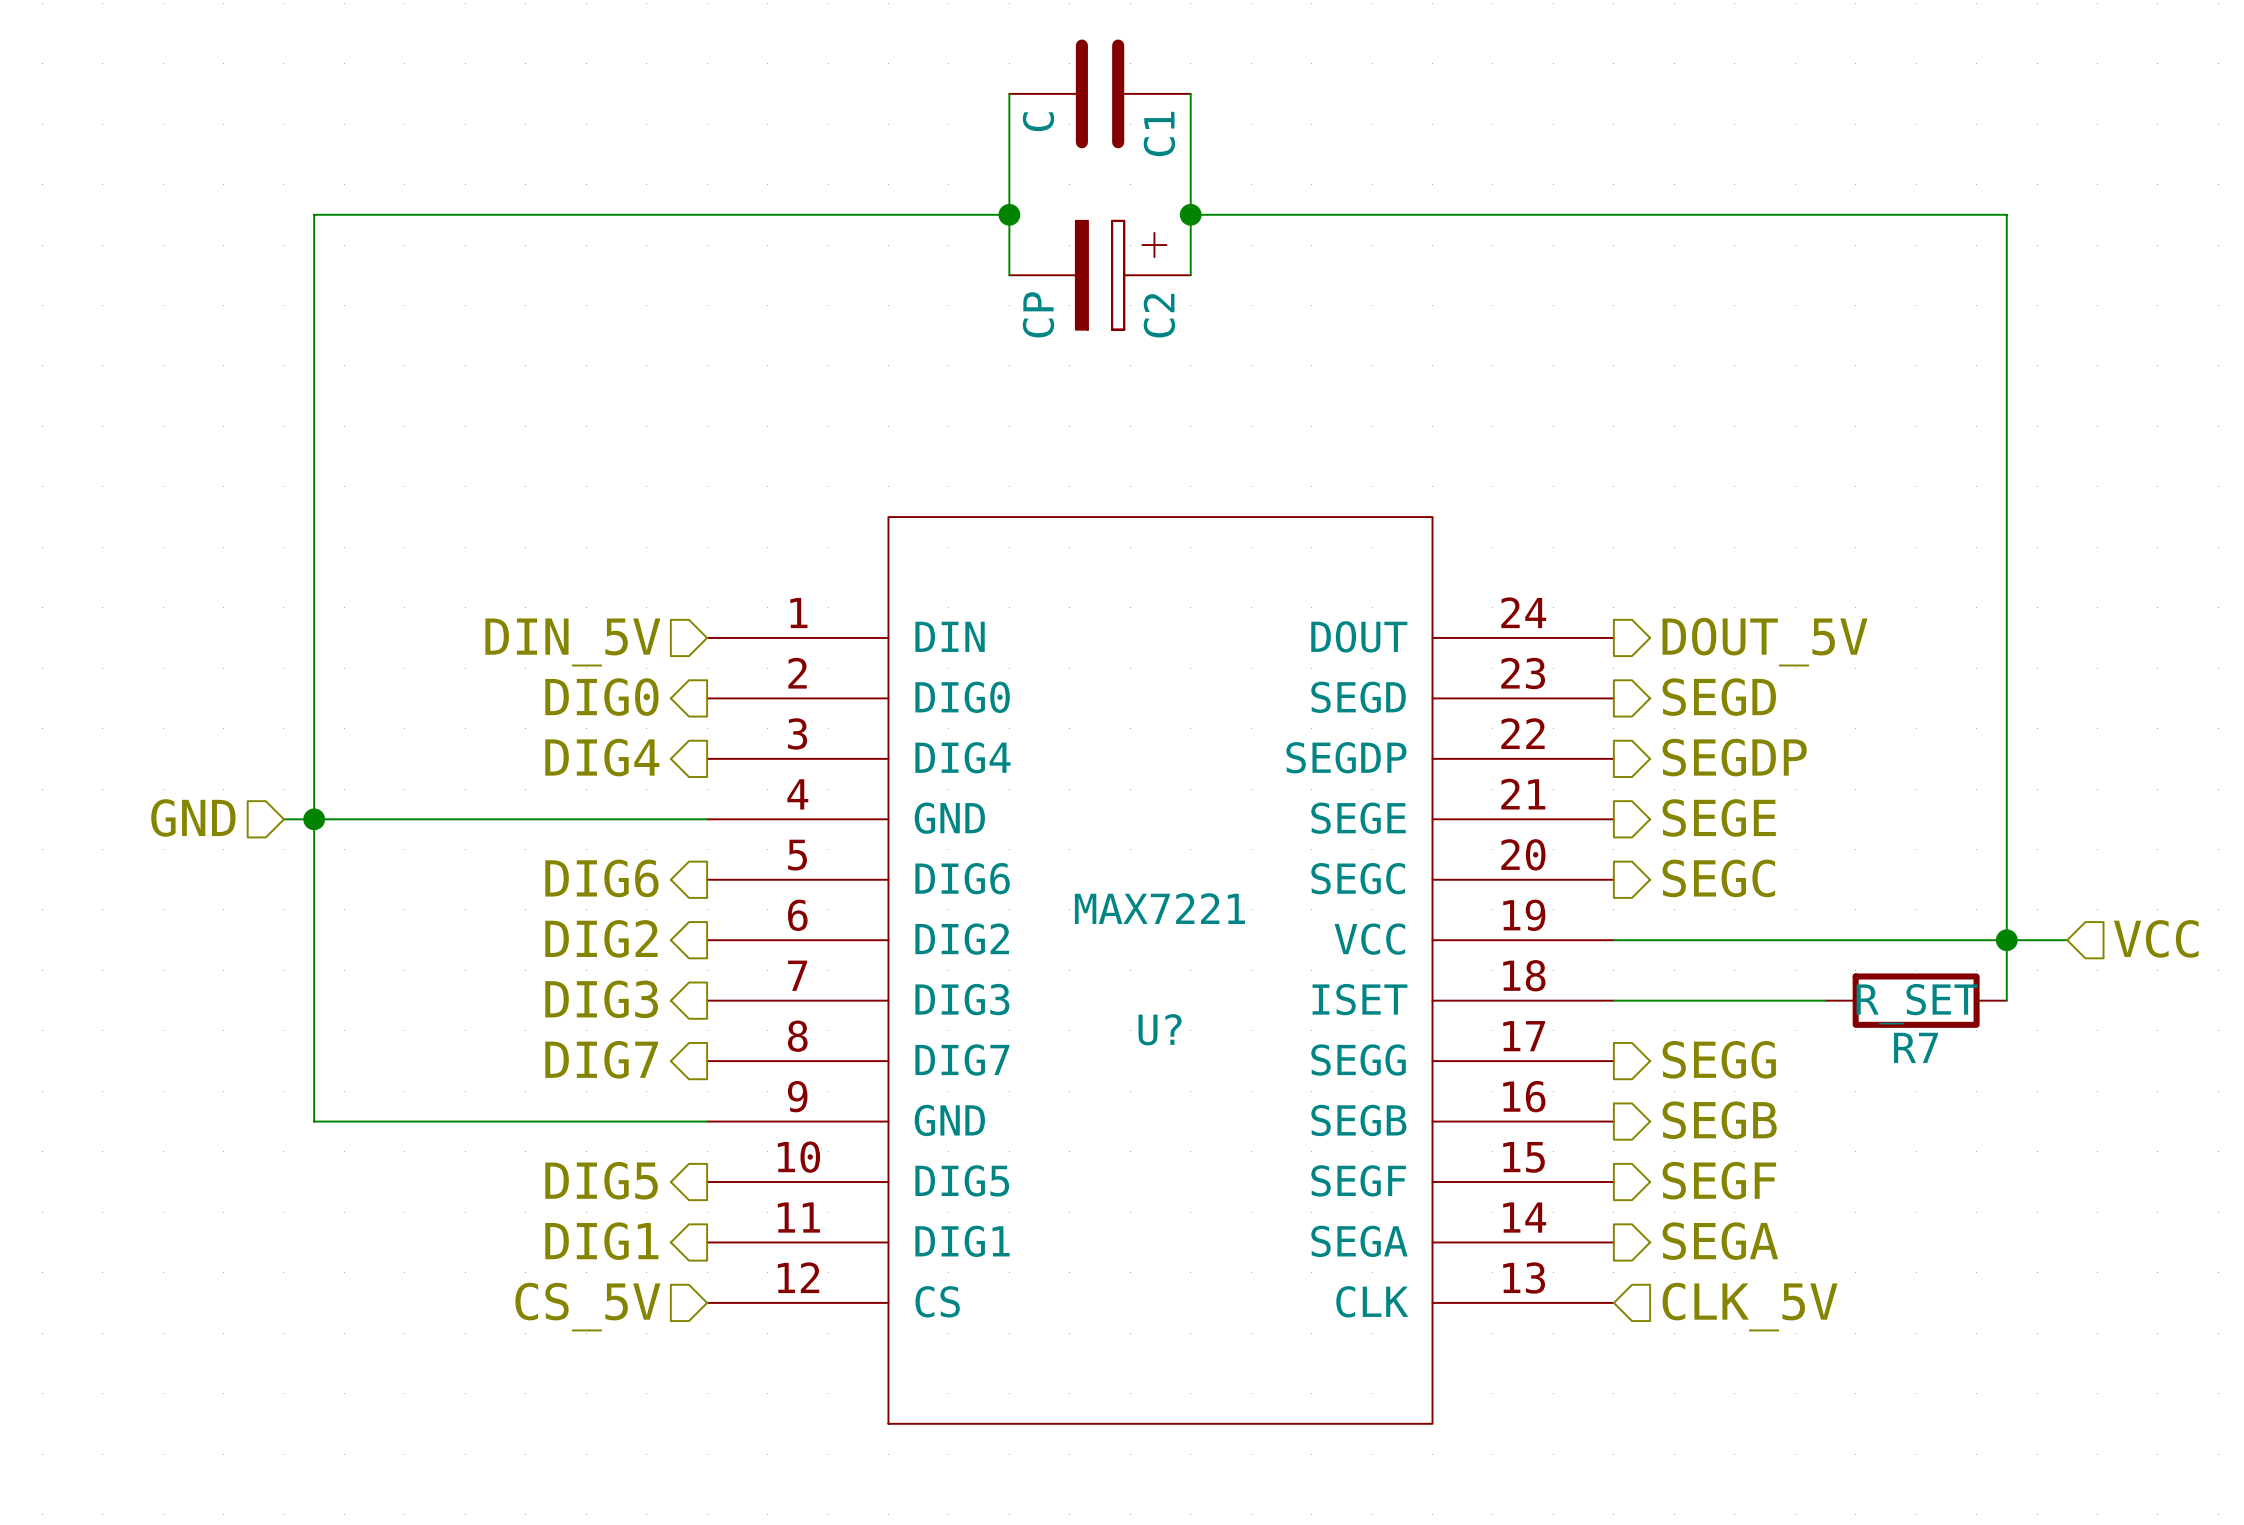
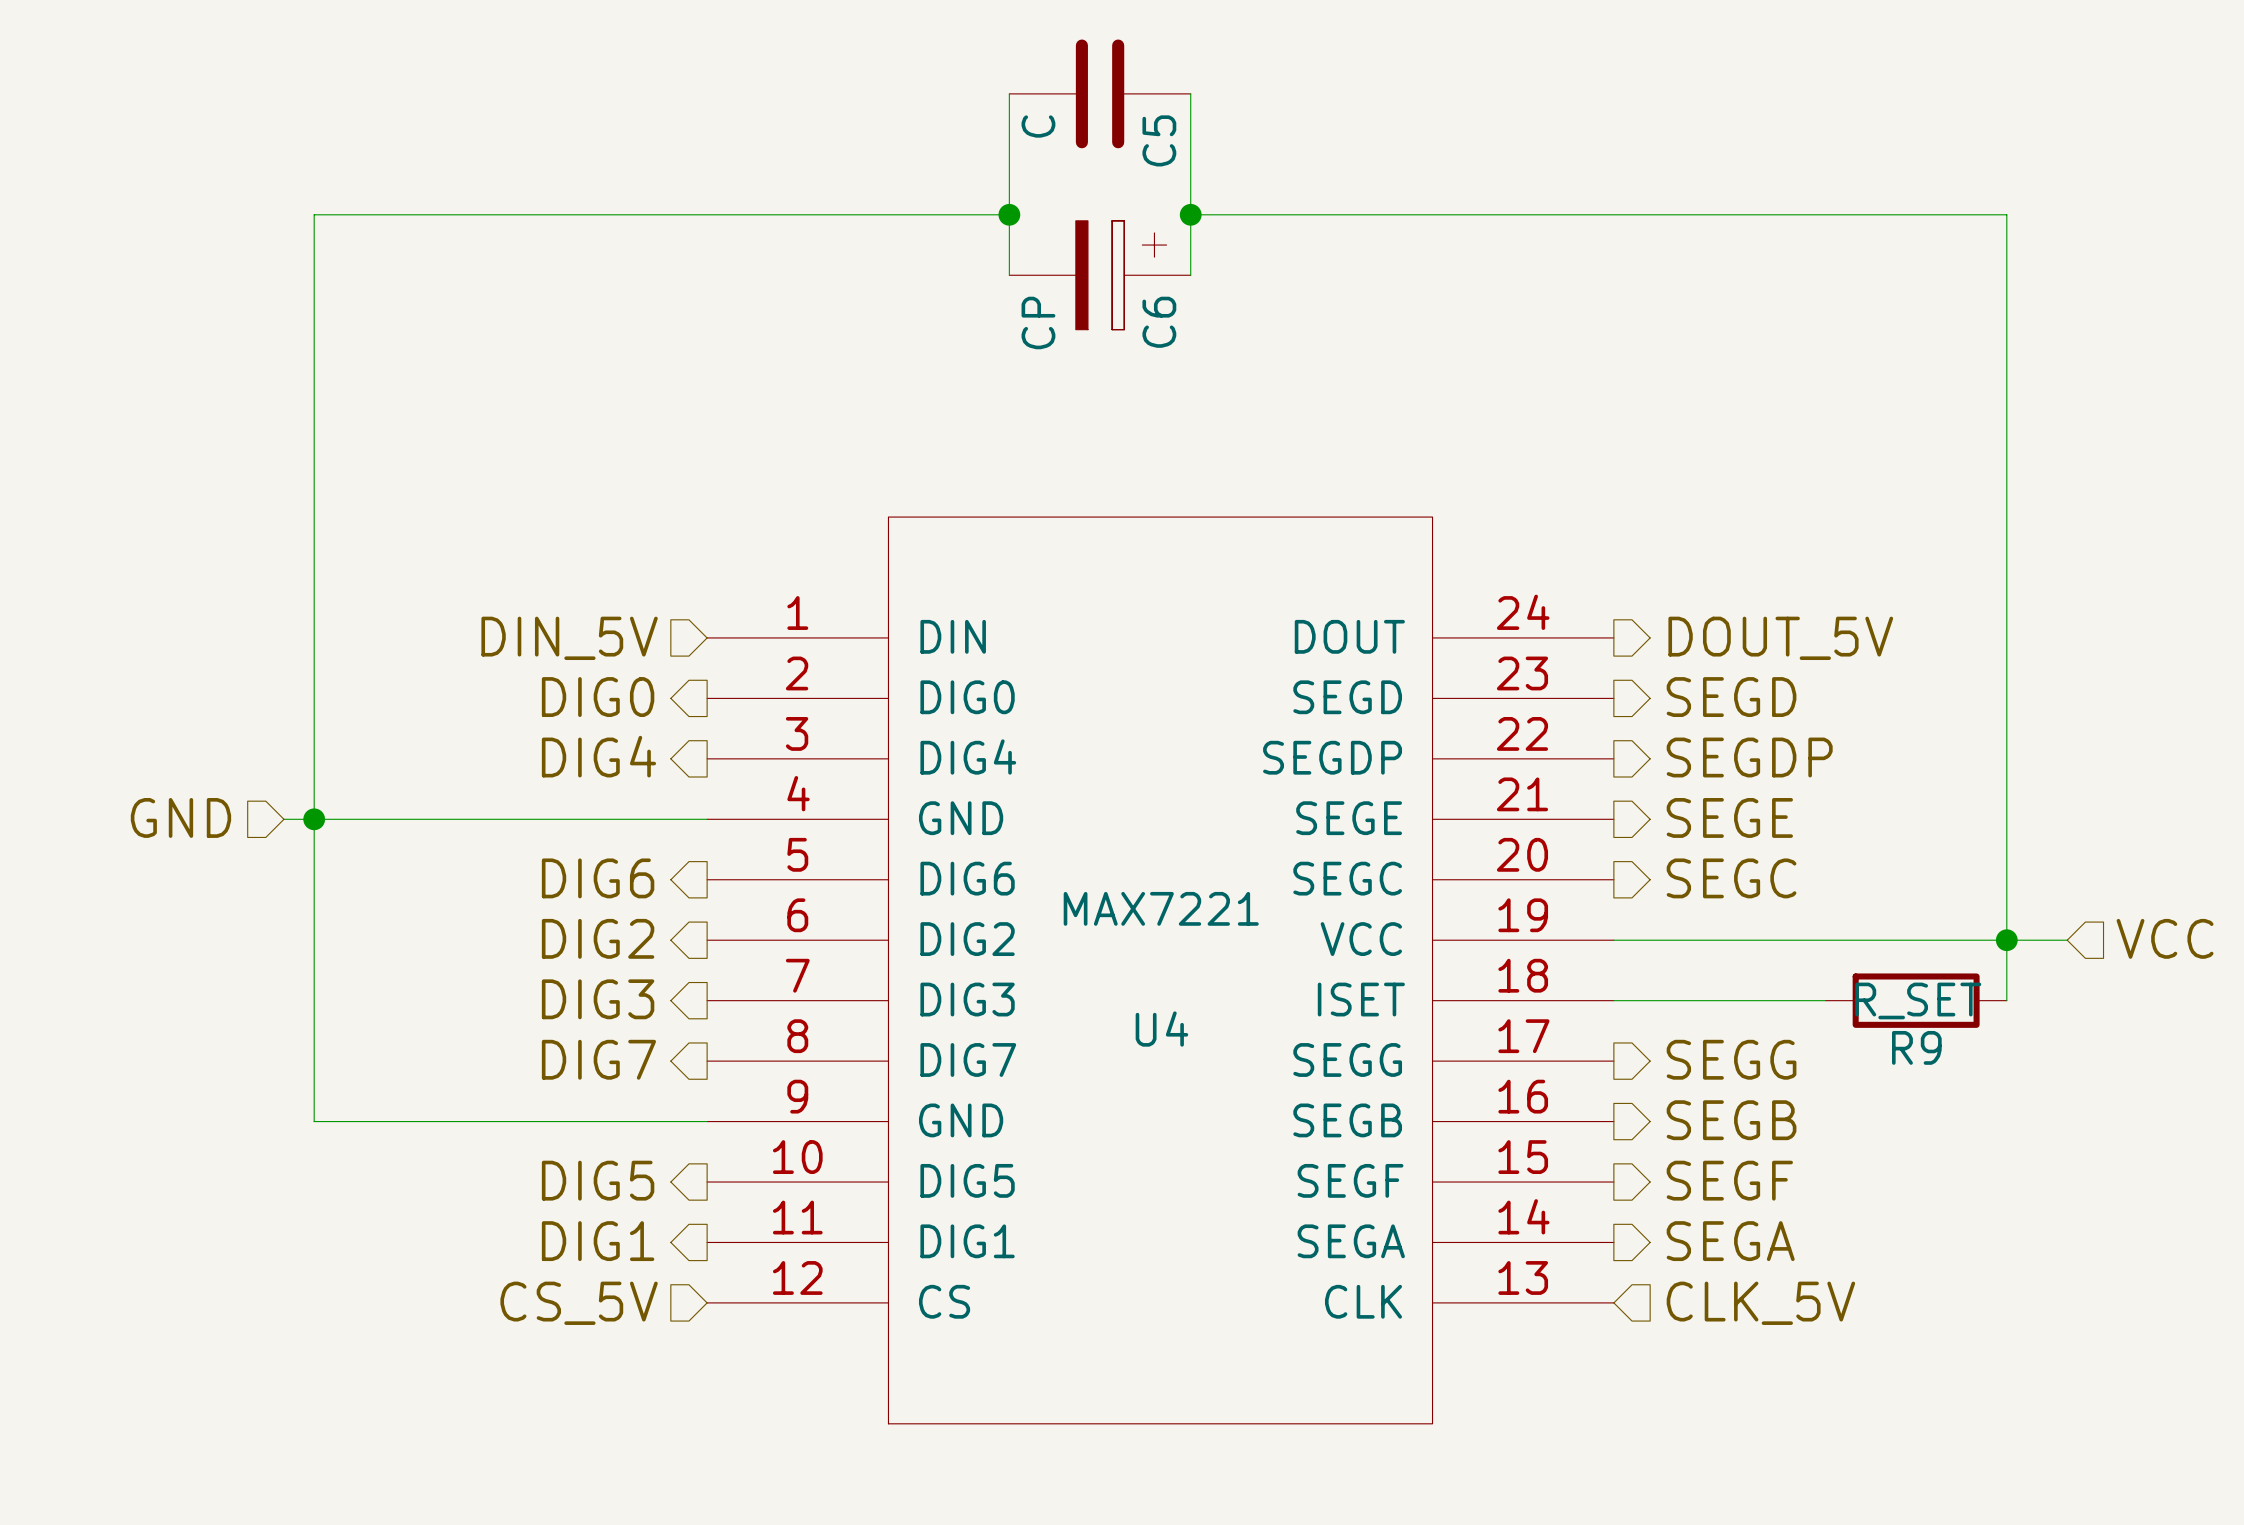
C1 name: C1 (1159, 133) -> C5 (1159, 140)
C2 name: C2 (1159, 315) -> C6 (1159, 322)
U? name: U? (1160, 1029) -> U4 (1161, 1029)
R7 name: R7 (1916, 1047) -> R9 (1916, 1047)

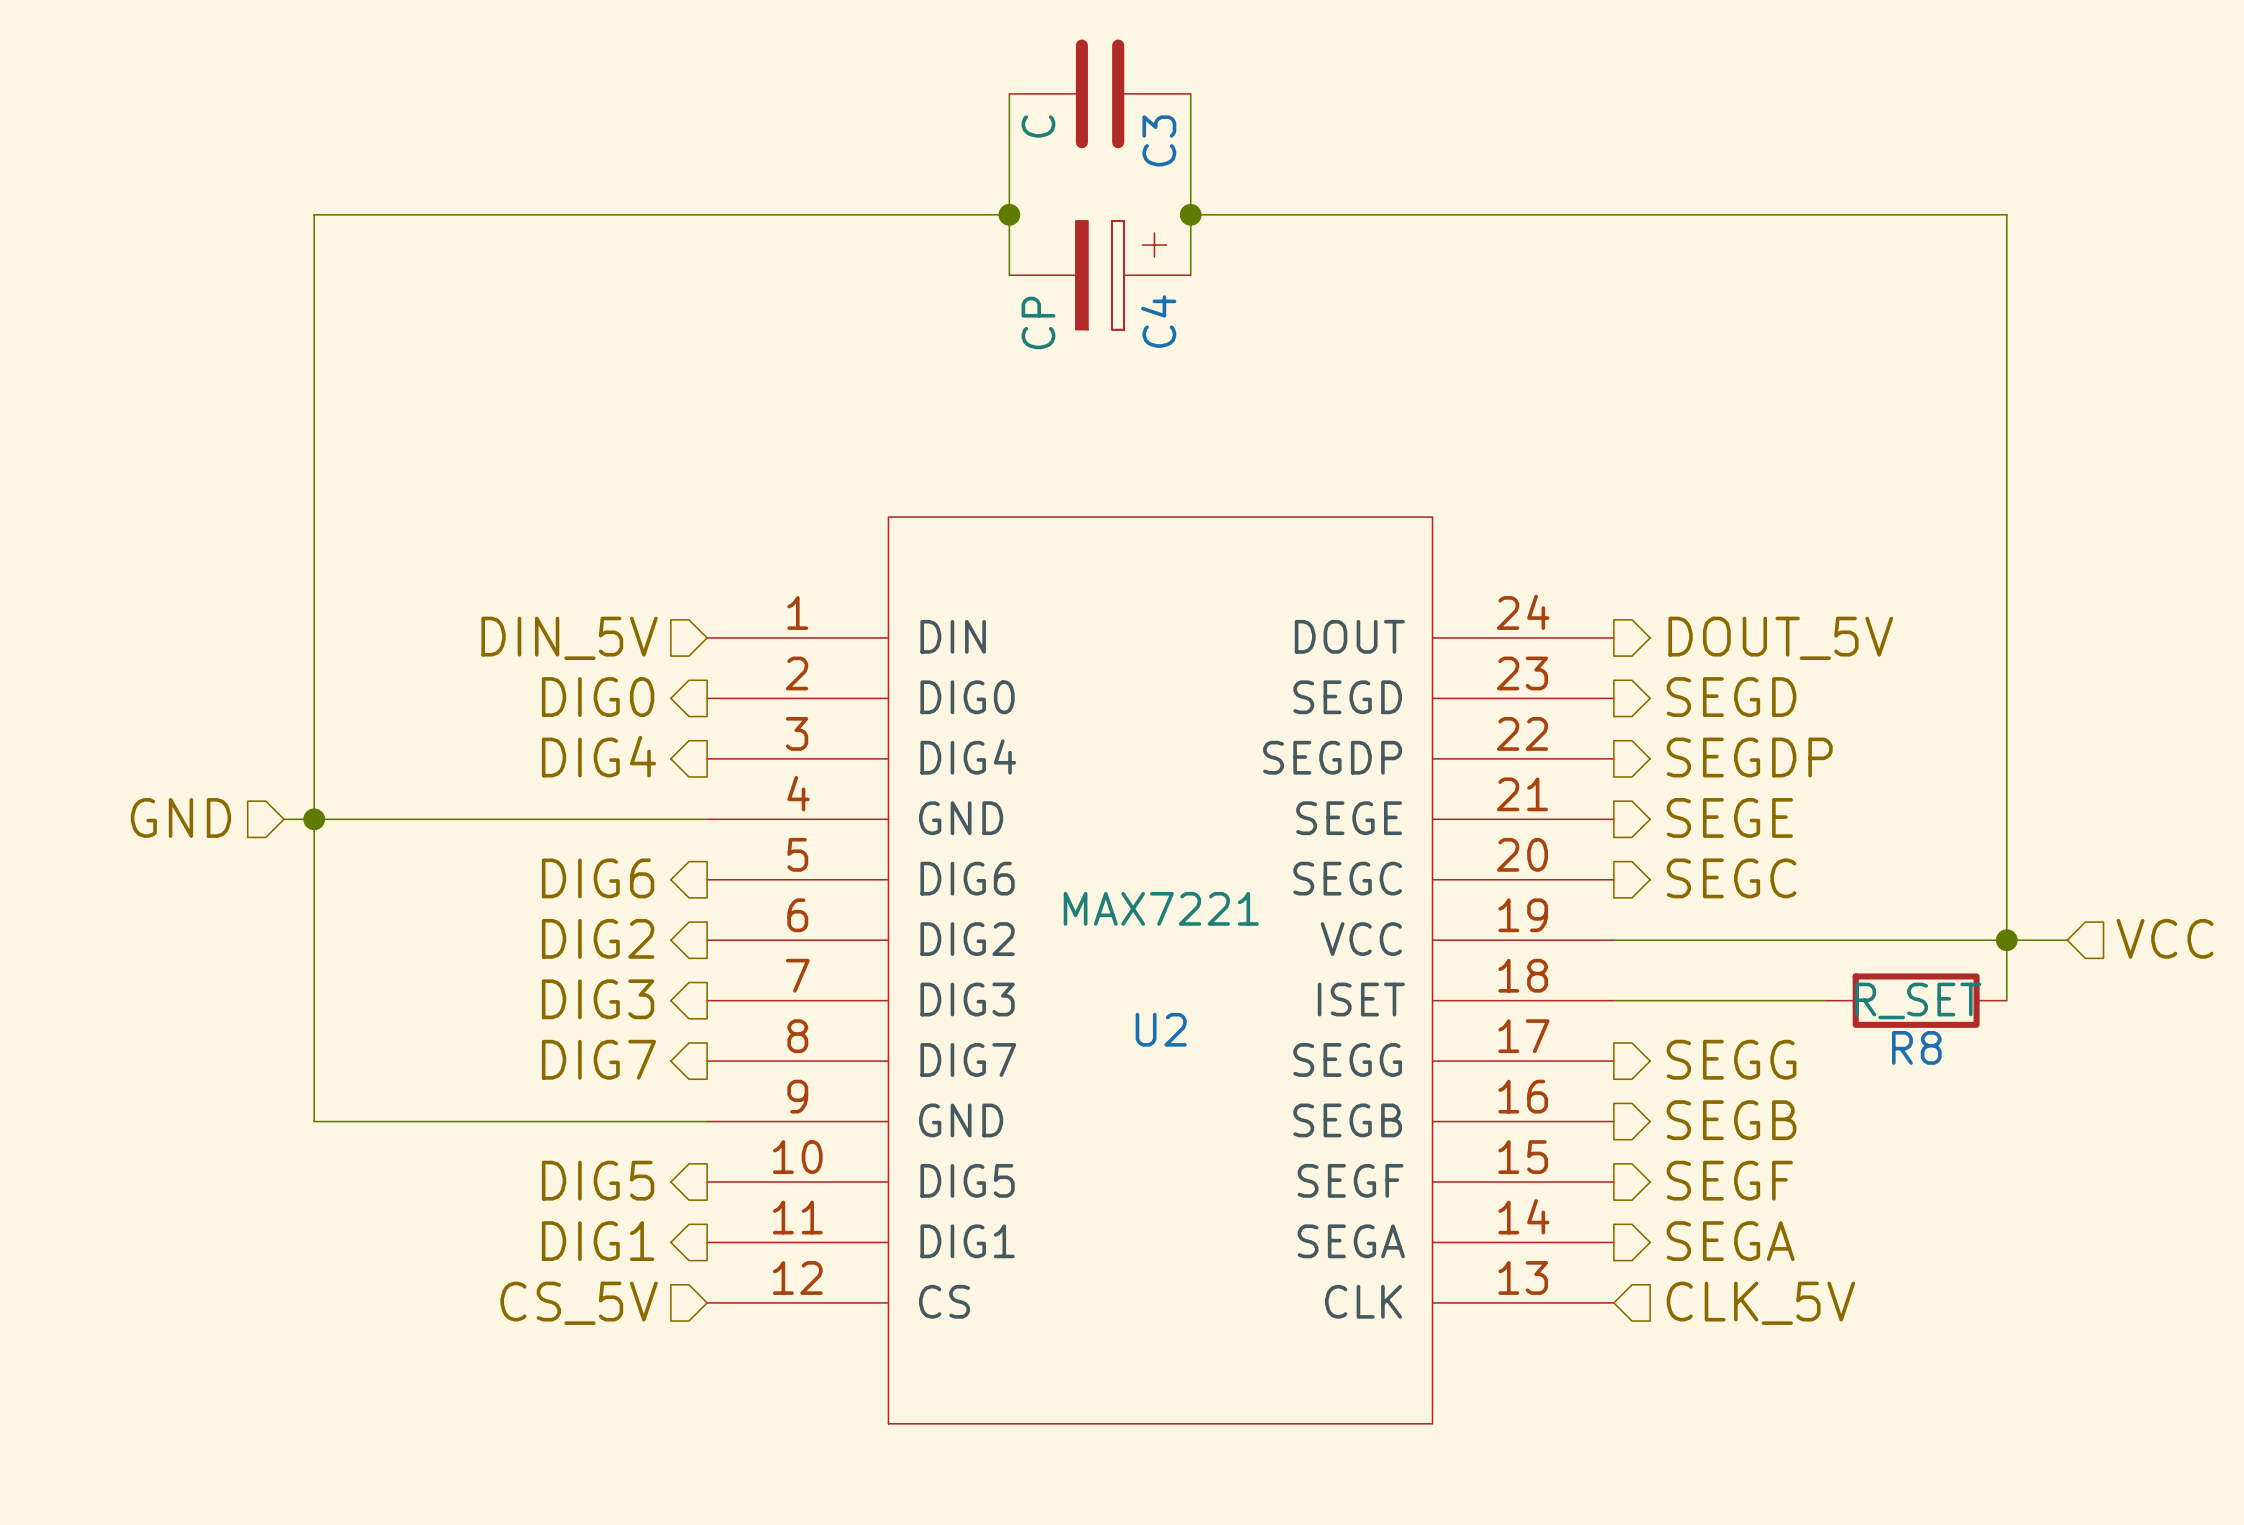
C5 name: C5 (1159, 140) -> C3 (1159, 140)
C6 name: C6 (1159, 322) -> C4 (1158, 321)
U4 name: U4 (1161, 1029) -> U2 (1161, 1029)
R9 name: R9 (1916, 1047) -> R8 (1916, 1047)

